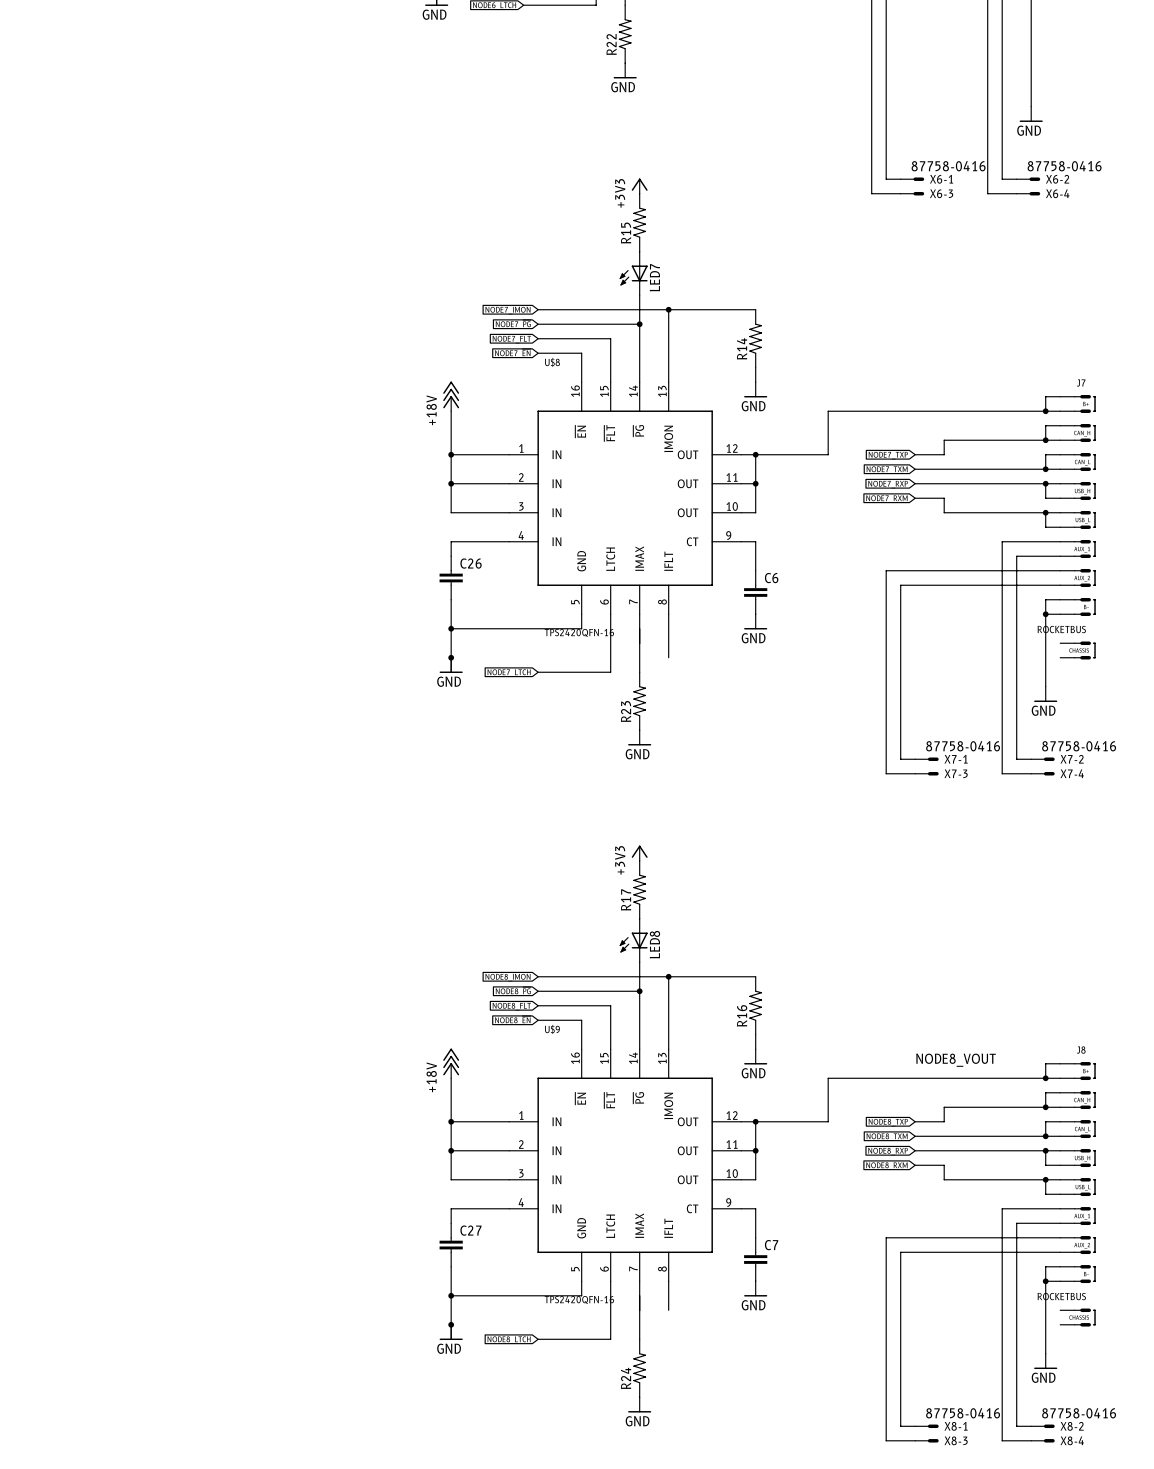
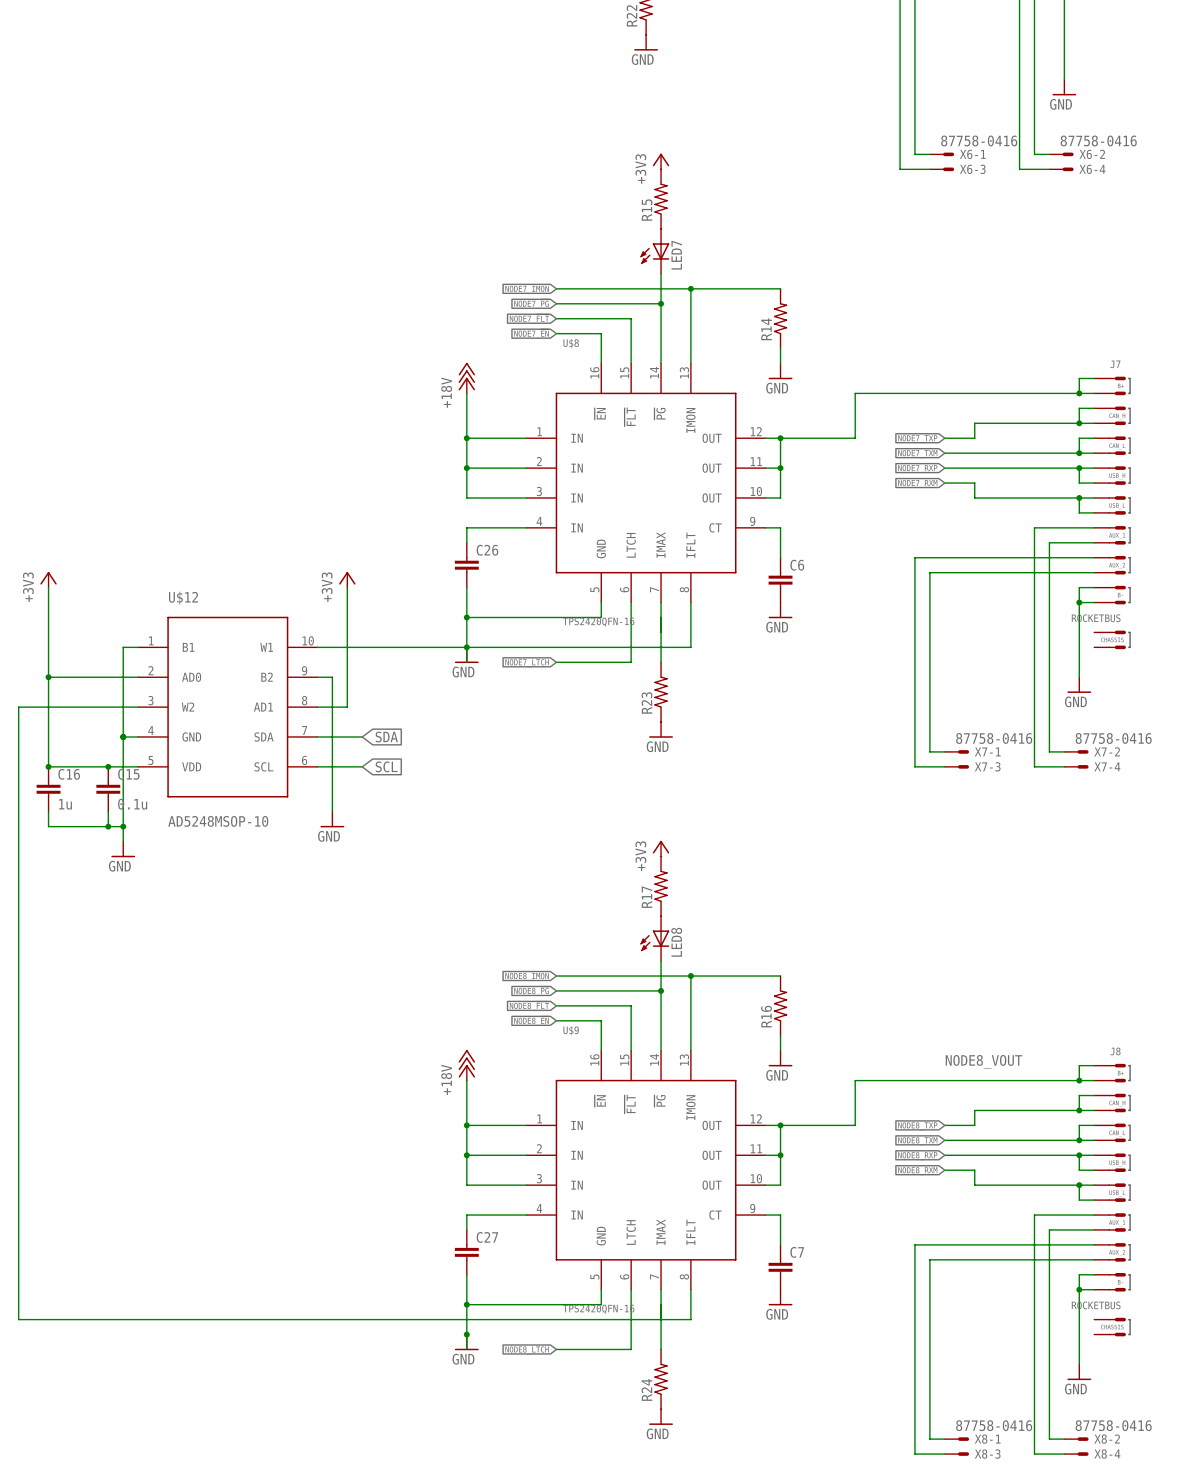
power symbol: none -> +3V3 (48, 579)
power symbol: none -> +3V3 (347, 579)
wire: none -> (48, 587) (48, 766) (138, 766)
wire: none -> (347, 587) (347, 707) (317, 707)
wire: none -> (138, 647) (123, 647) (123, 841)
wire: none -> (317, 647) (690, 647)
wire: none -> (48, 677) (138, 677)
junction: none -> (48, 677)
wire: none -> (317, 677) (332, 677) (332, 811)
wire: none -> (138, 707) (18, 707) (18, 1319) (690, 1319)
U$12: none -> AD5248MSOP-10 (227, 707)
wire: none -> (123, 737) (138, 737)
junction: none -> (123, 737)
wire: none -> (317, 737) (362, 737)
global label: none -> SDA (386, 737)
junction: none -> (48, 766)
junction: none -> (108, 766)
wire: none -> (317, 766) (362, 766)
global label: none -> SCL (386, 766)
C16: none -> 1u (48, 789)
C15: none -> 0.1u (108, 789)
wire: none -> (48, 811) (48, 826) (123, 826)
wire: none -> (108, 811) (108, 826)
power symbol: none -> GND (332, 819)
junction: none -> (108, 826)
junction: none -> (123, 826)
power symbol: none -> GND (123, 849)

